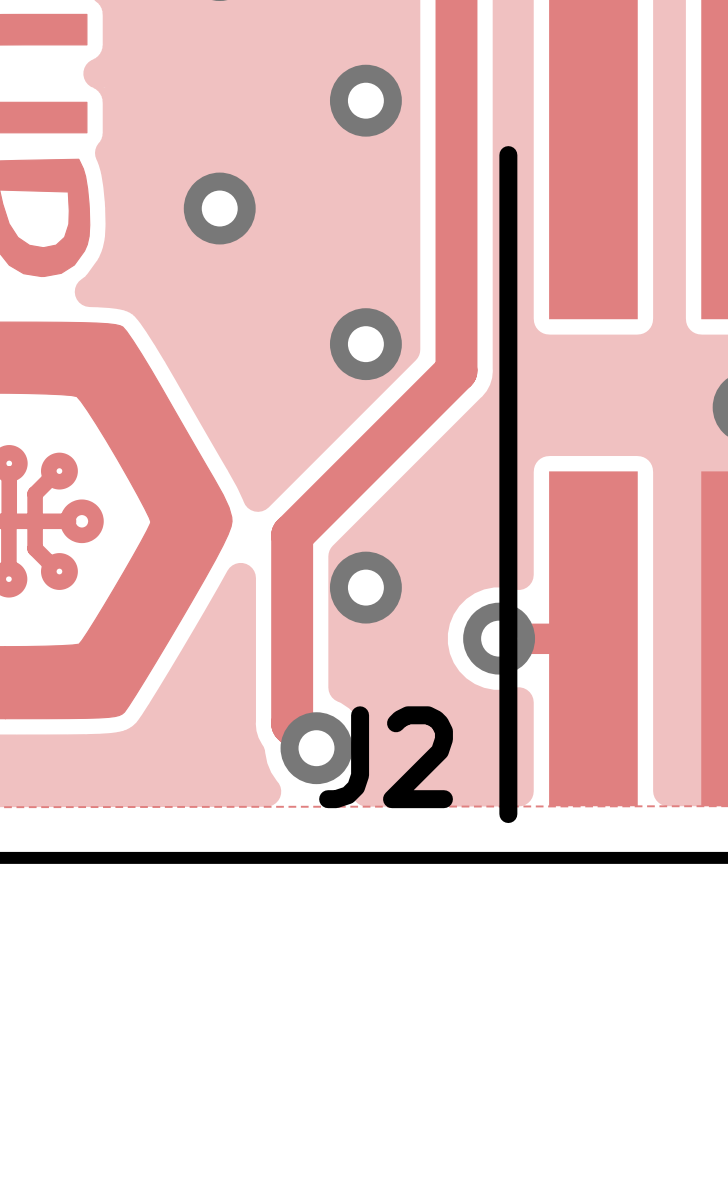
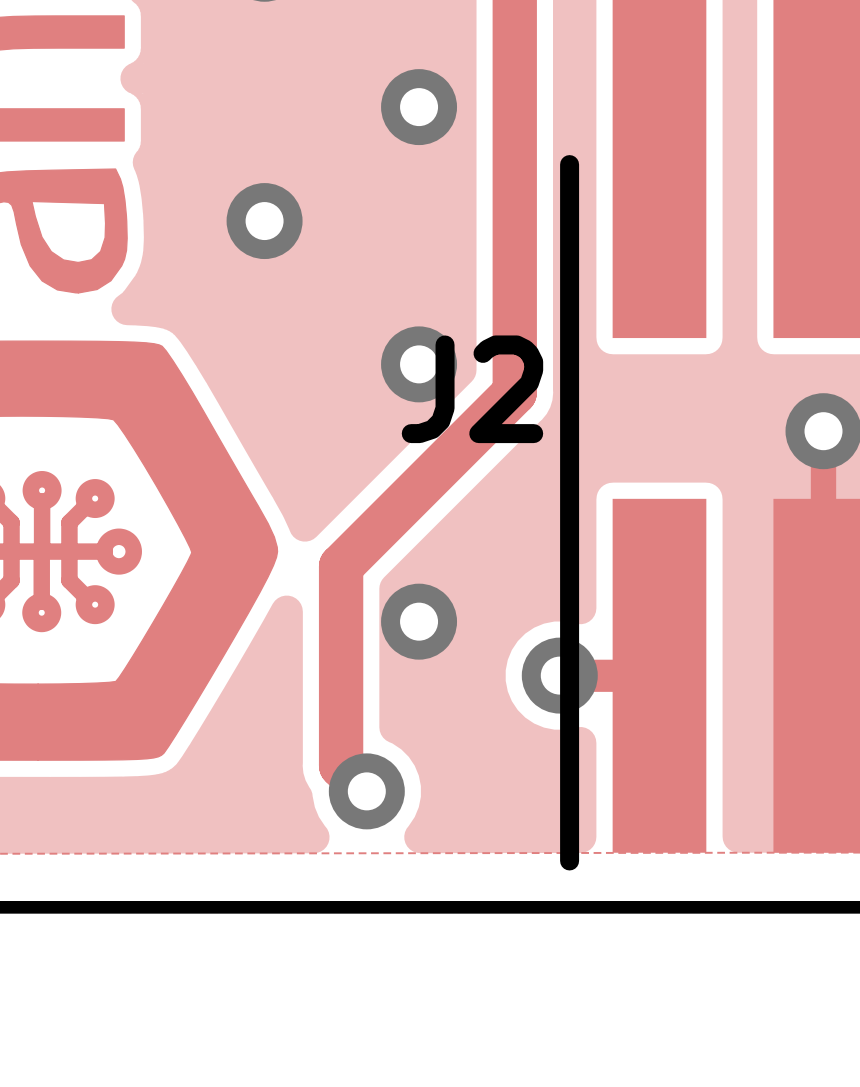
J2 name position: J2 (386, 757) -> J2 (472, 389)

